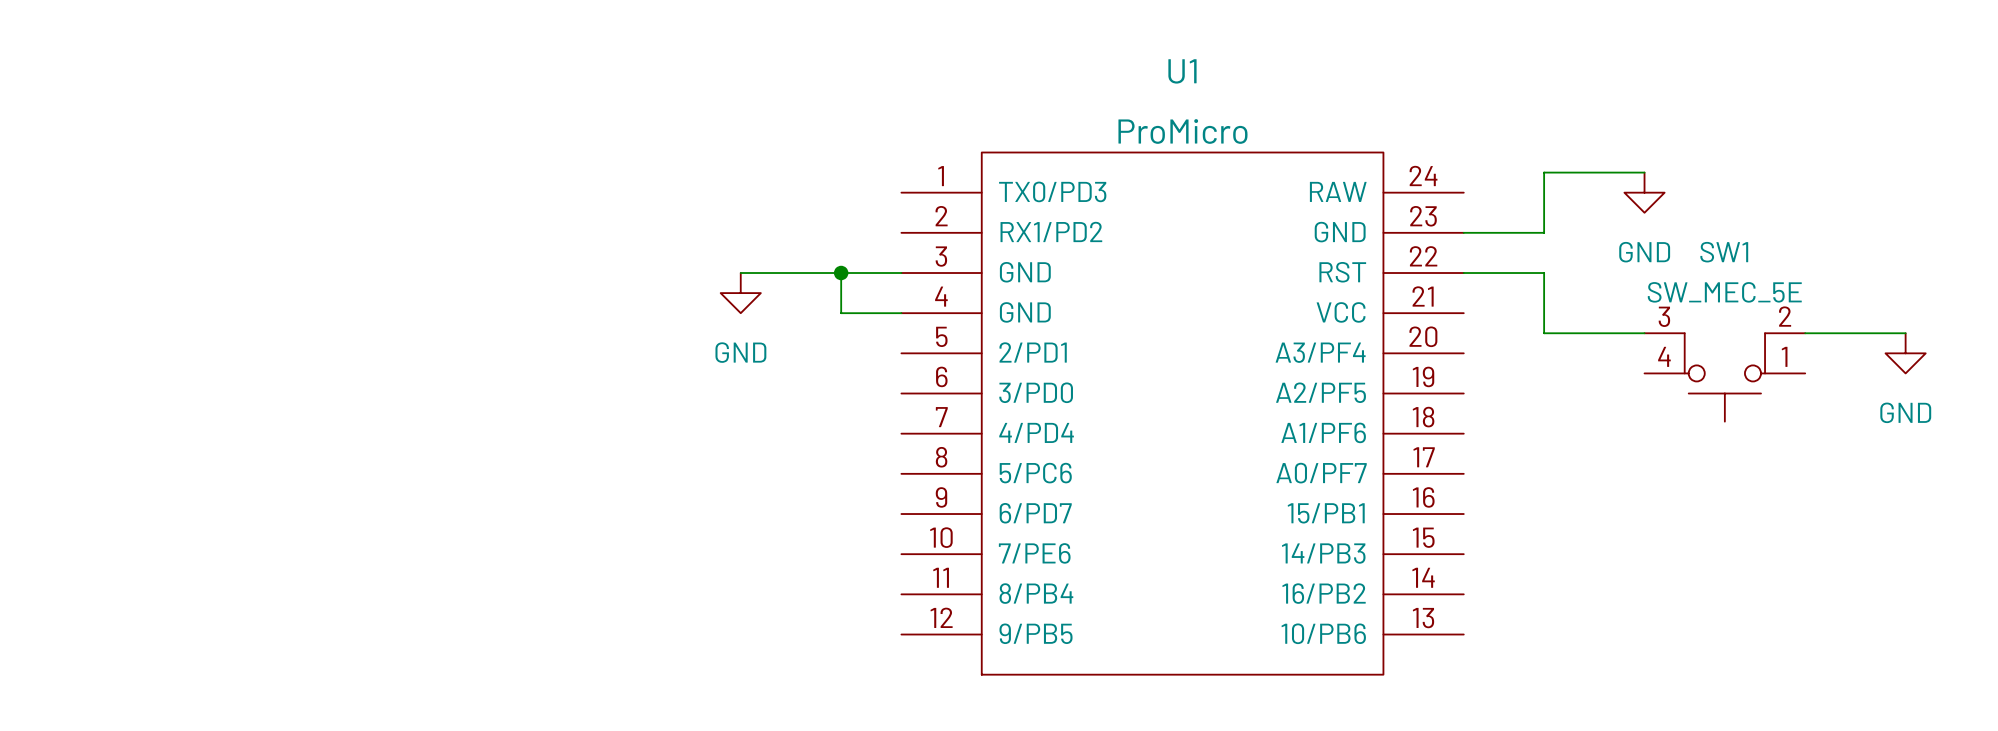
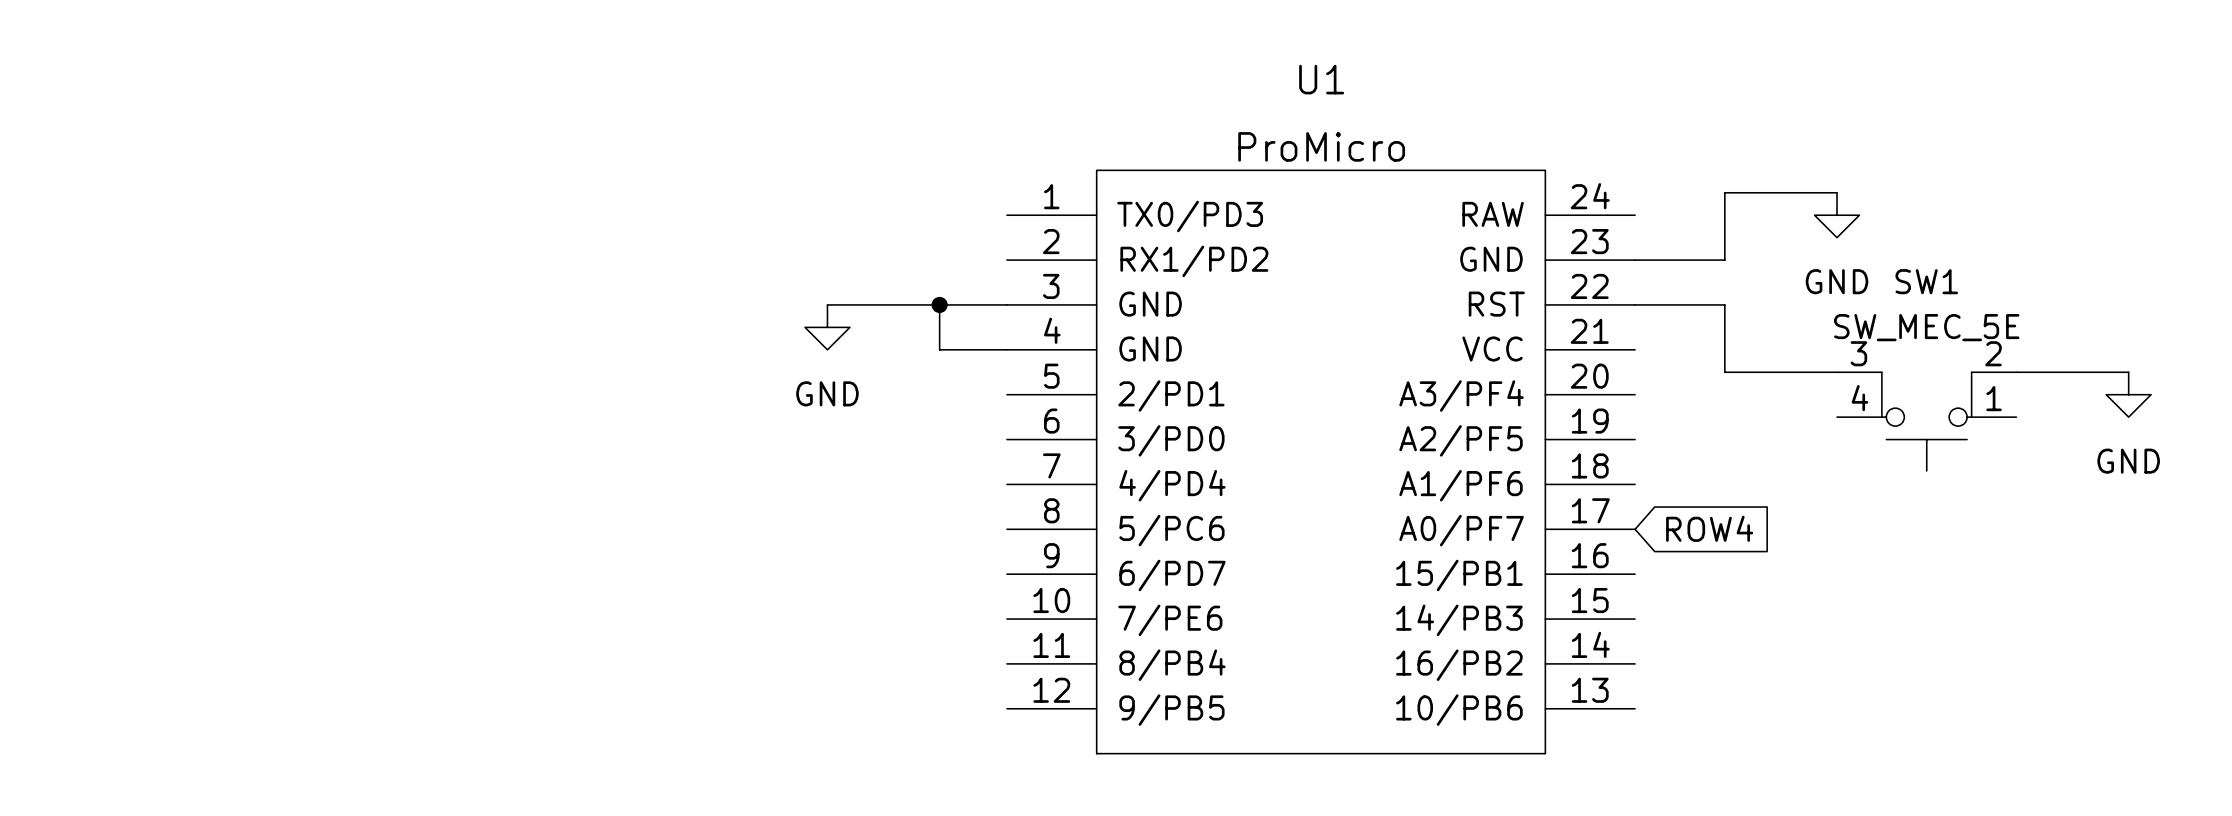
global label: none -> ROW4 (1709, 528)

